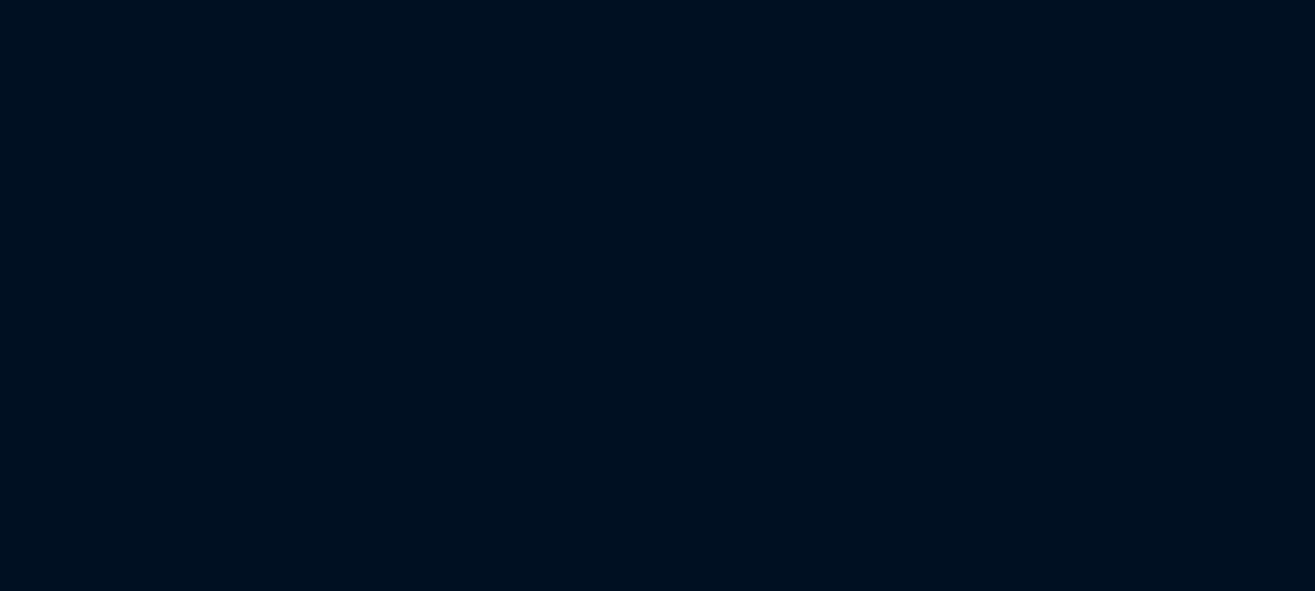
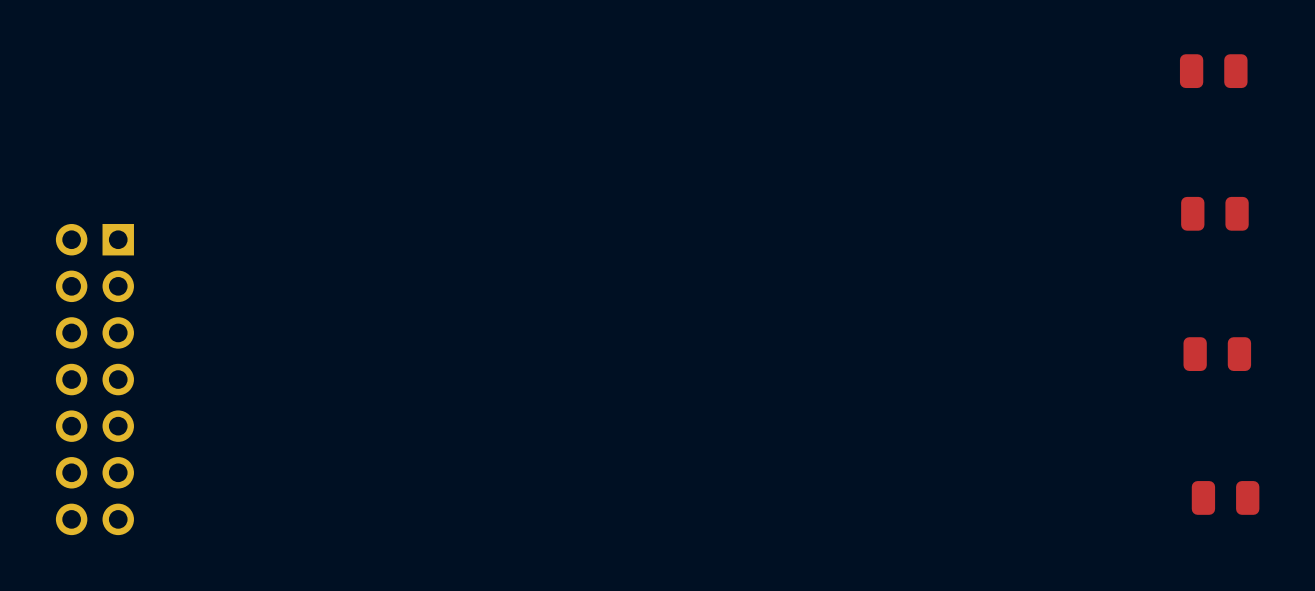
part: none -> (1213, 71)
part: none -> (1214, 213)
part: none -> (1217, 354)
part: none -> (94, 379)
part: none -> (1225, 497)

